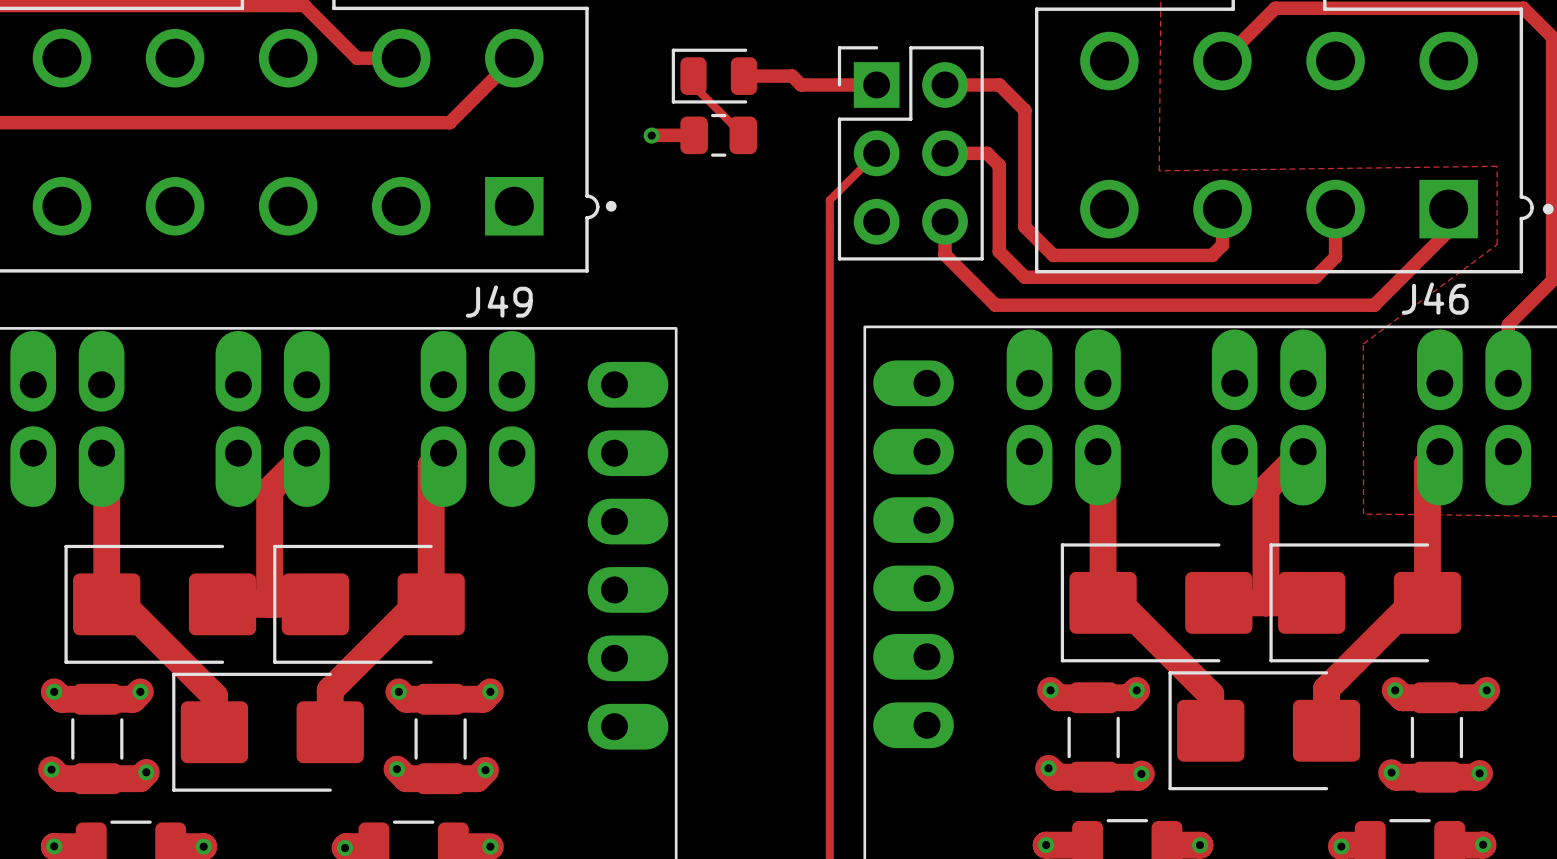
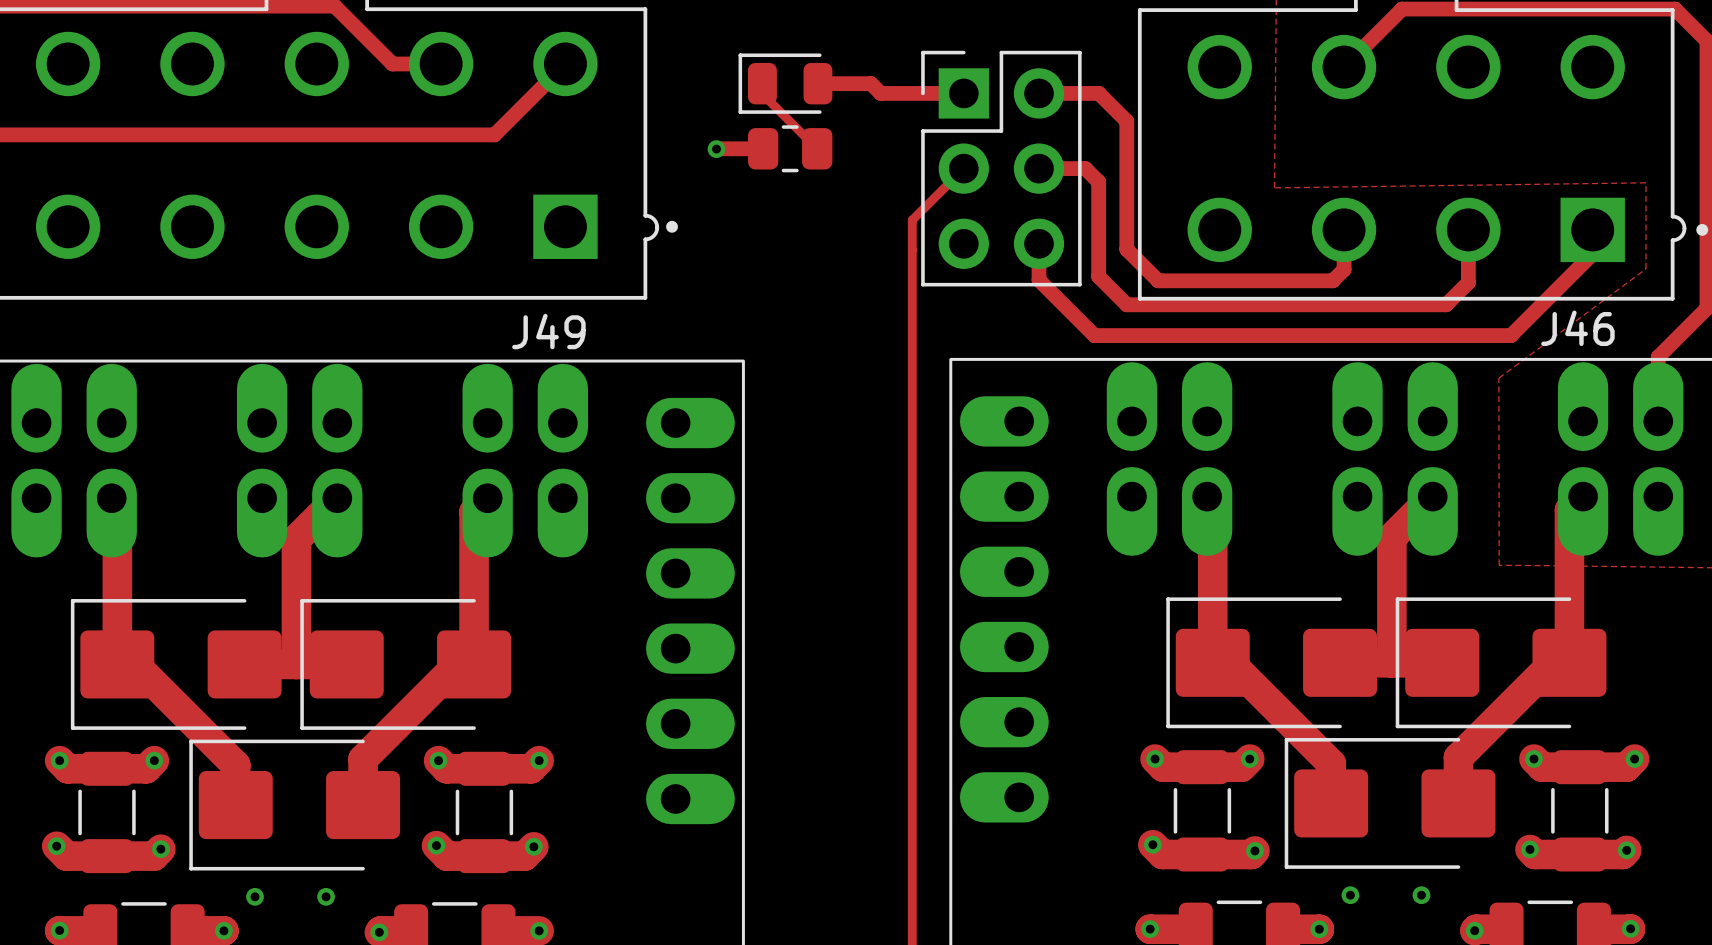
via: none -> (1350, 895)
via: none -> (1421, 895)
via: none -> (255, 896)
via: none -> (326, 896)

